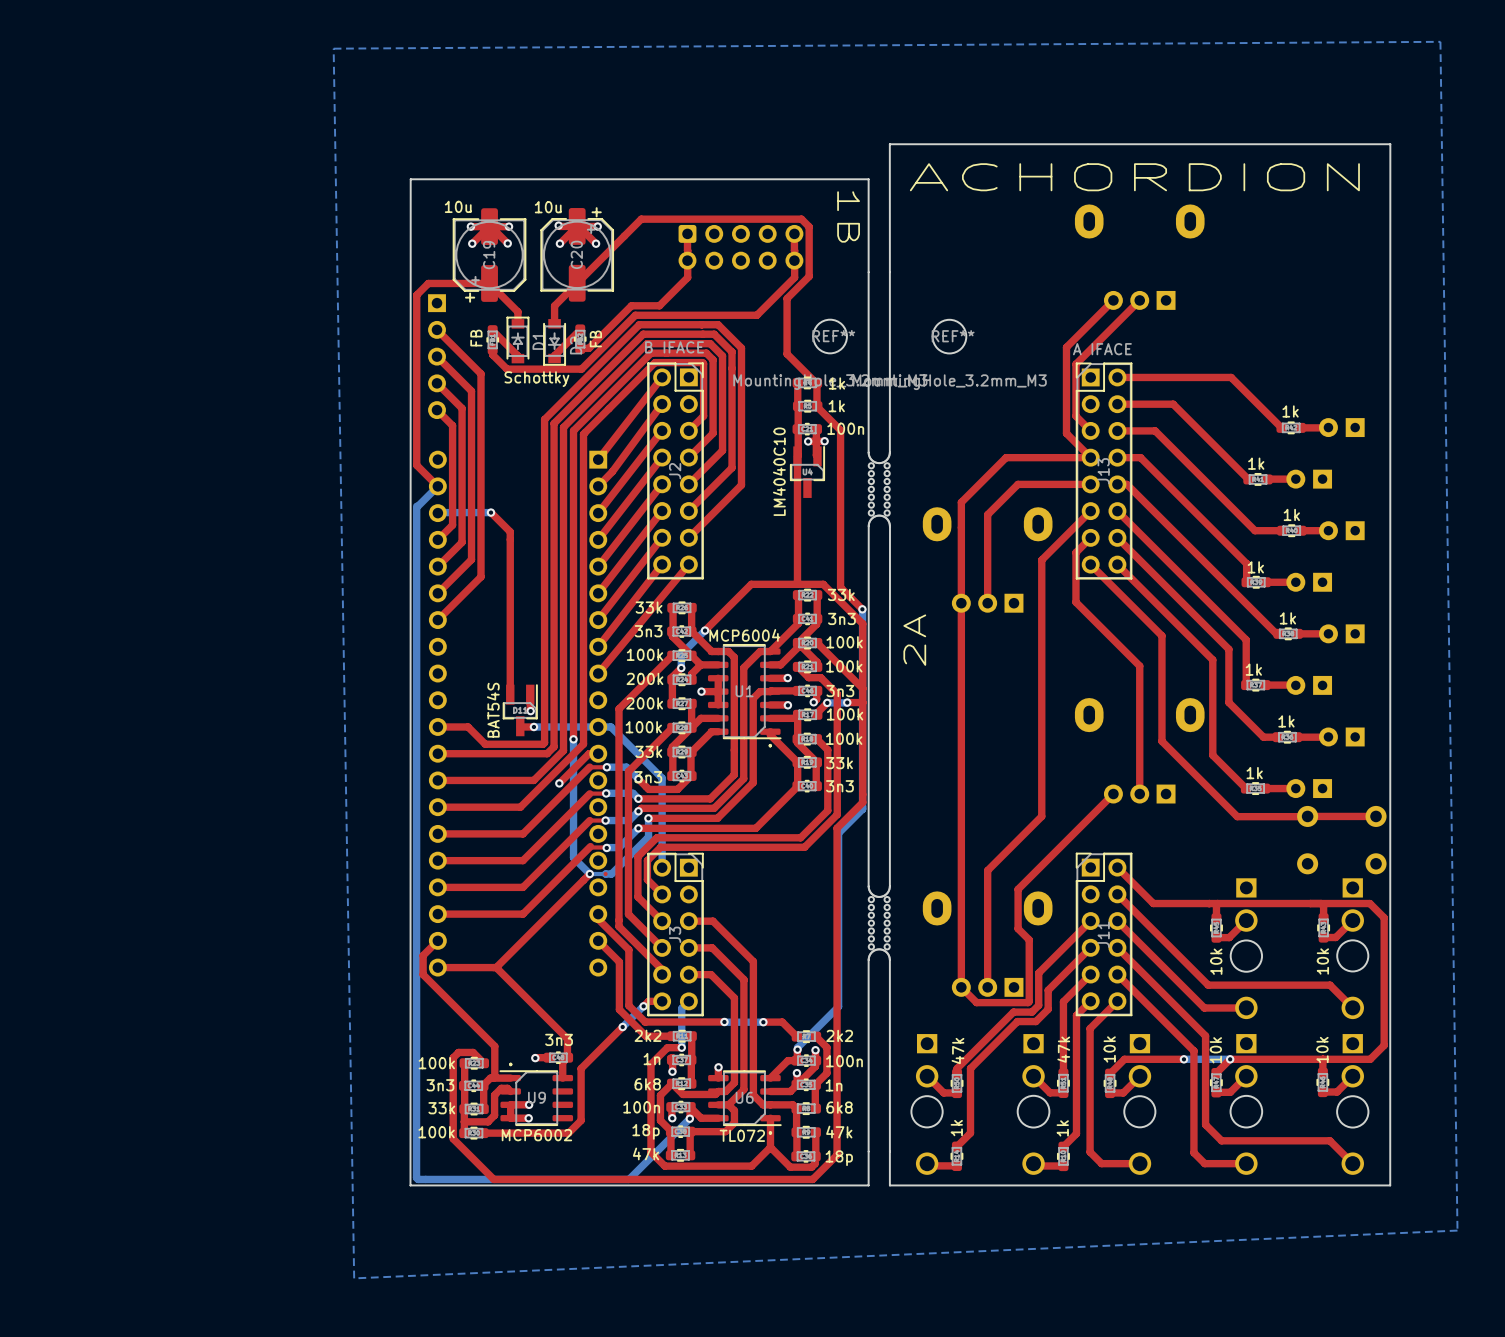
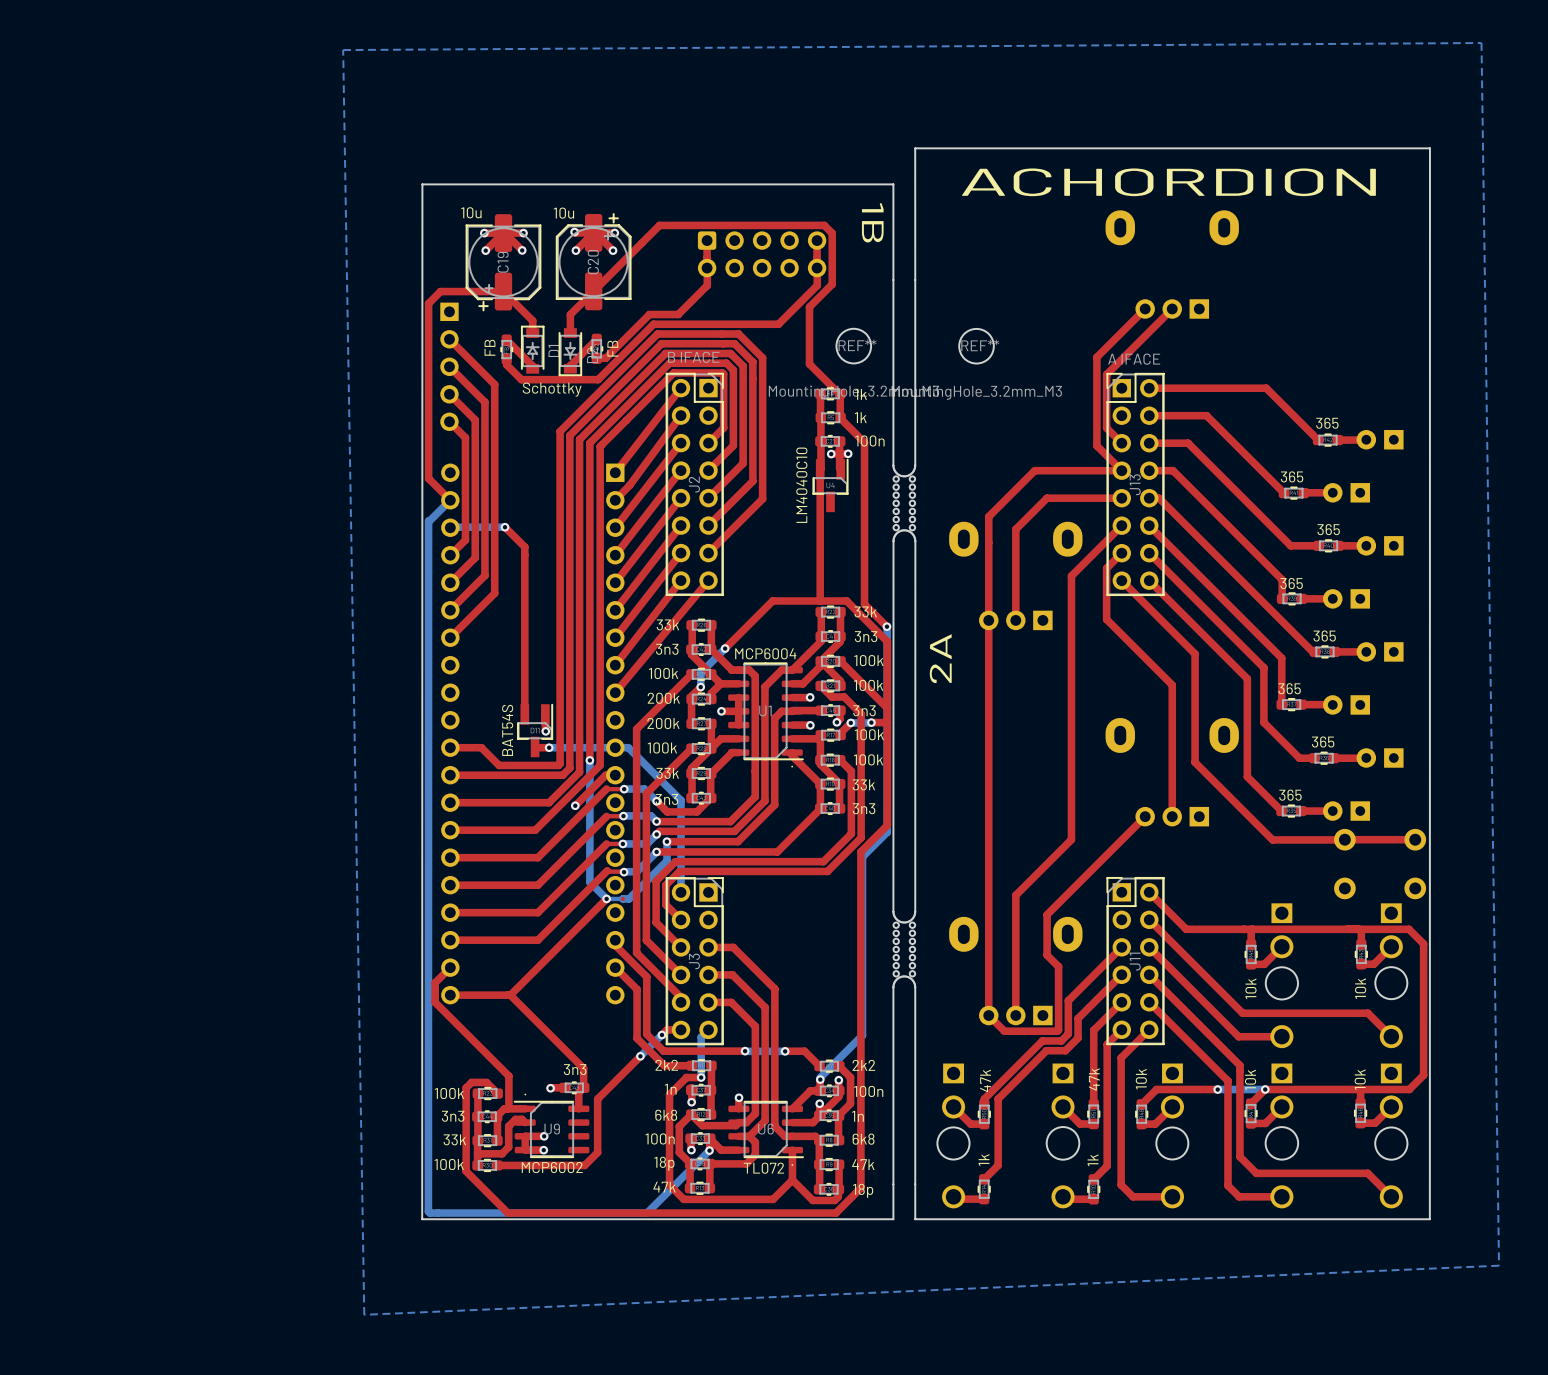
part value: 1k (1290, 411) -> 365 (1327, 423)
part value: 1k (1256, 463) -> 365 (1292, 476)
part value: 1k (1291, 514) -> 365 (1328, 529)
part value: 1k (1255, 567) -> 365 (1291, 583)
part value: 1k (1287, 618) -> 365 (1324, 636)
part value: 1k (1253, 669) -> 365 (1289, 688)
part value: 1k (1286, 721) -> 365 (1323, 742)
part value: 1k (1254, 773) -> 365 (1290, 795)

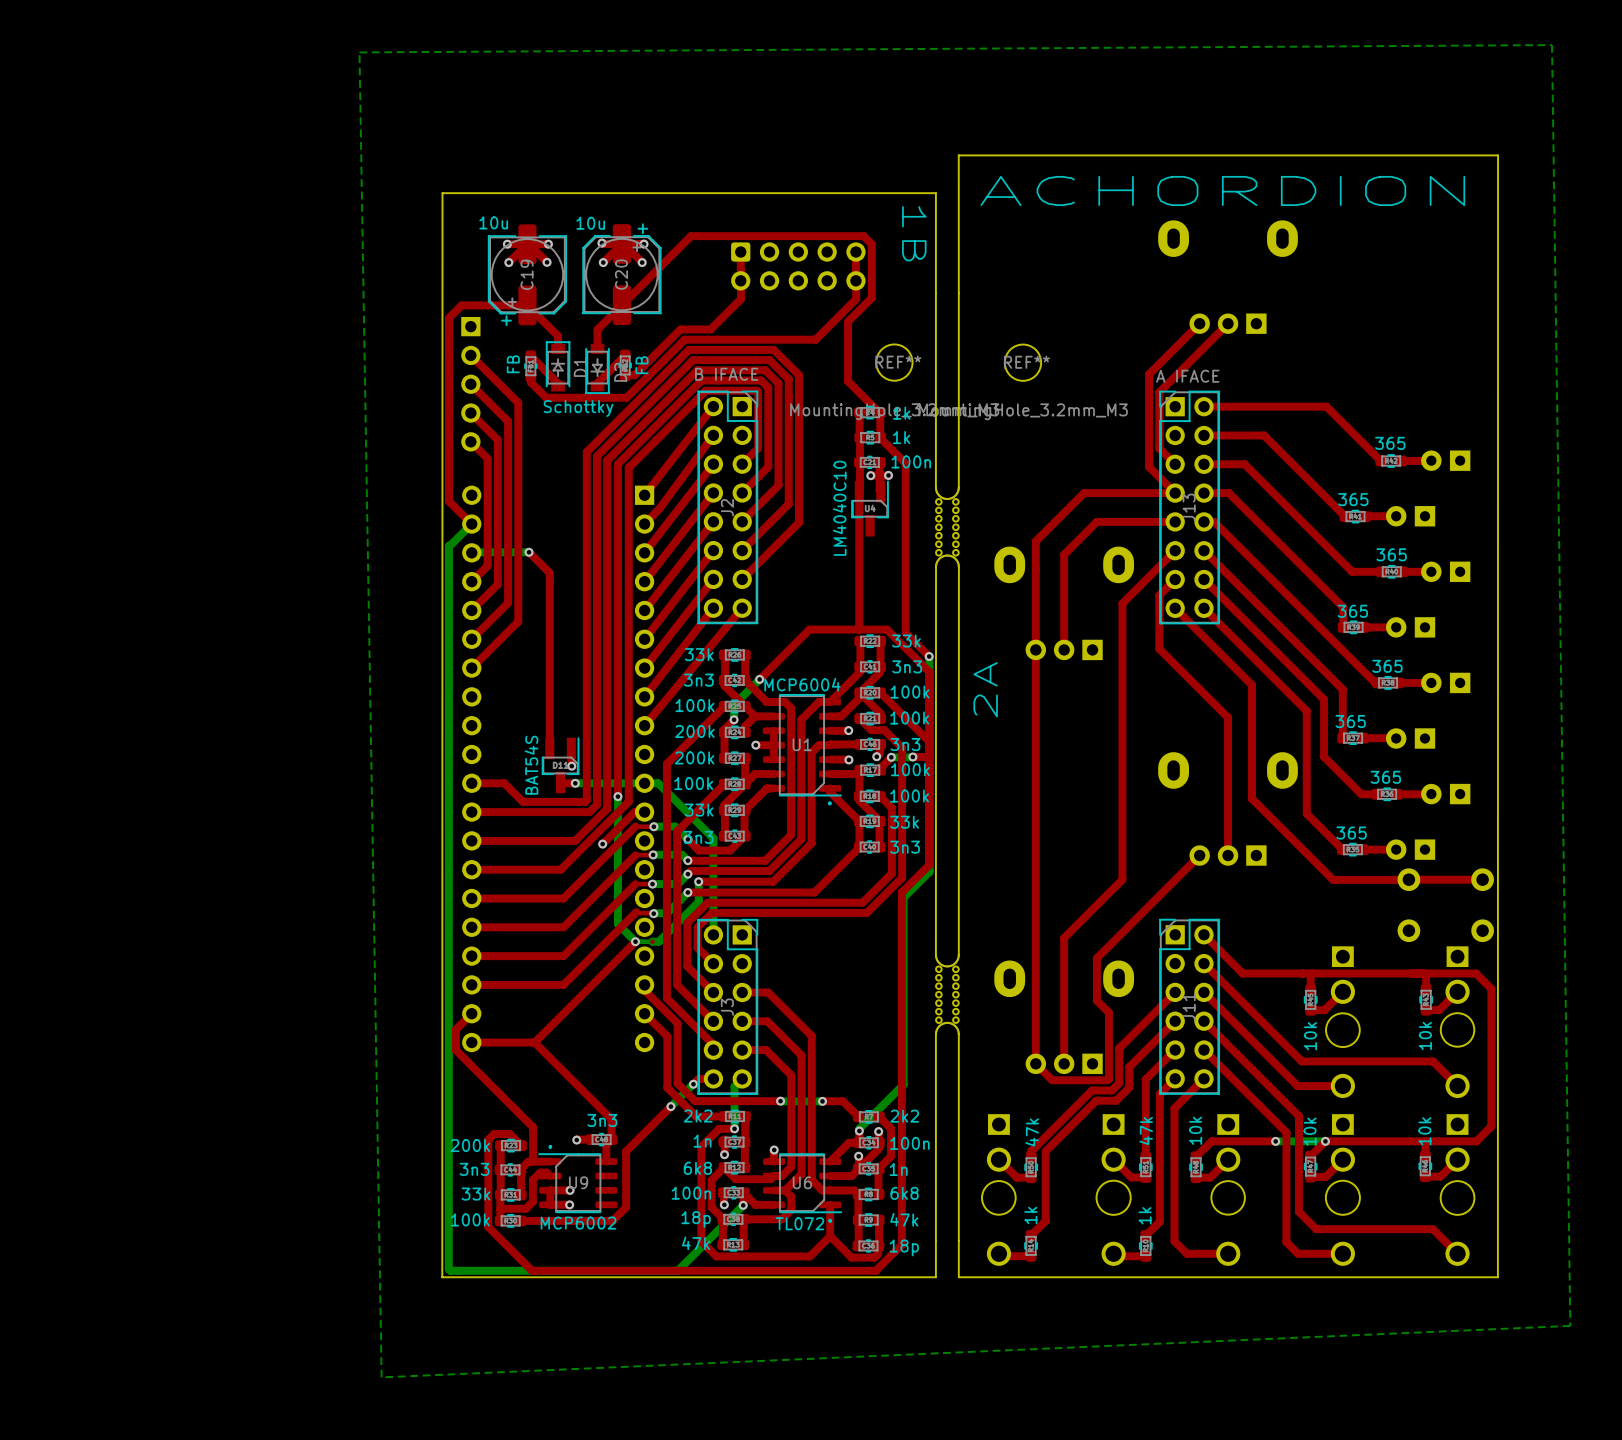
part value: 100k (449, 1093) -> 200k (470, 1145)

